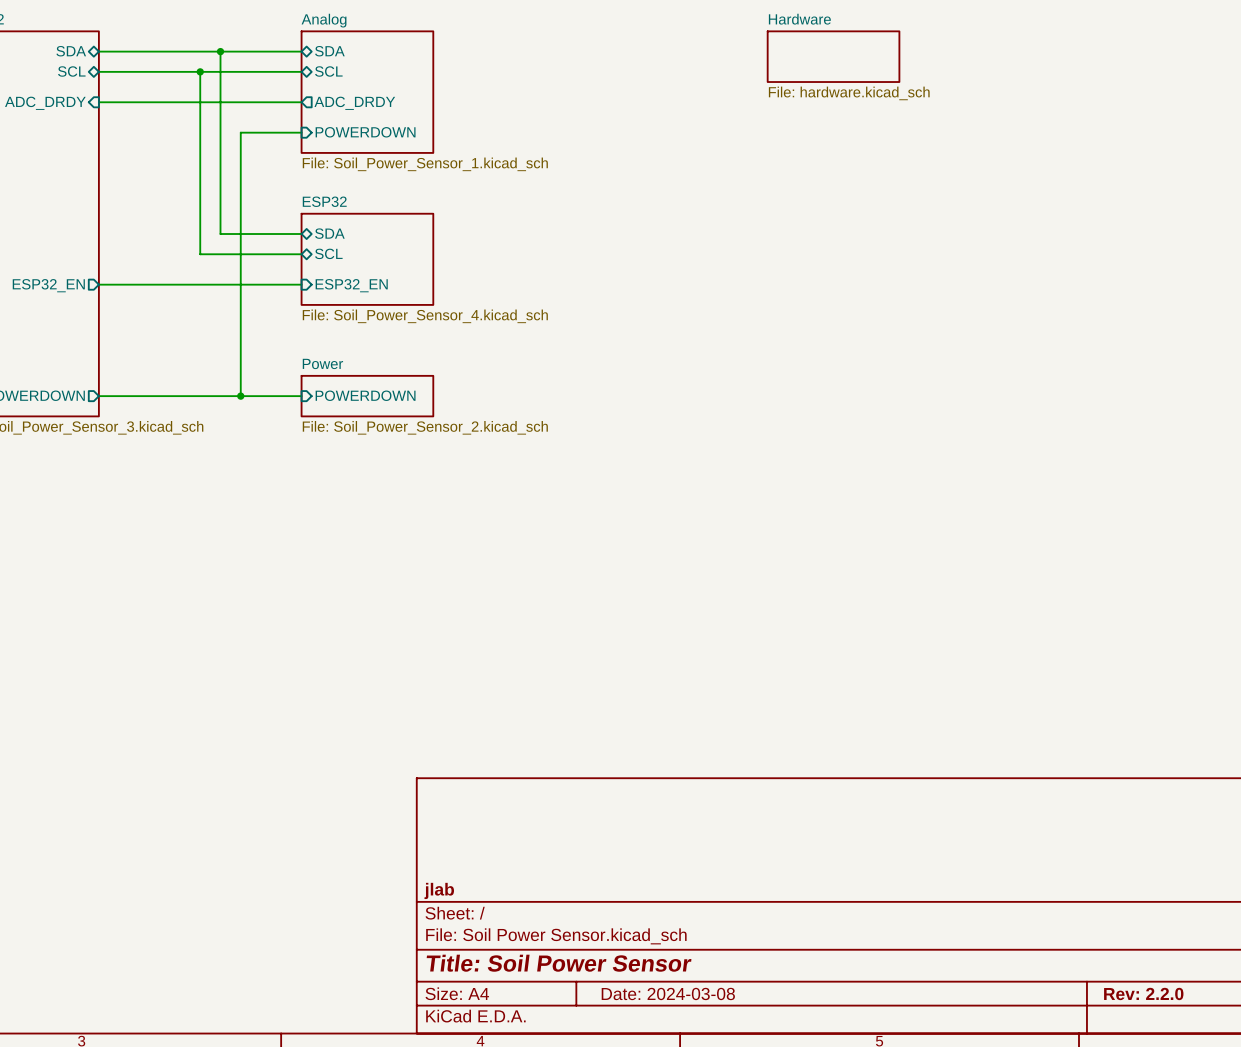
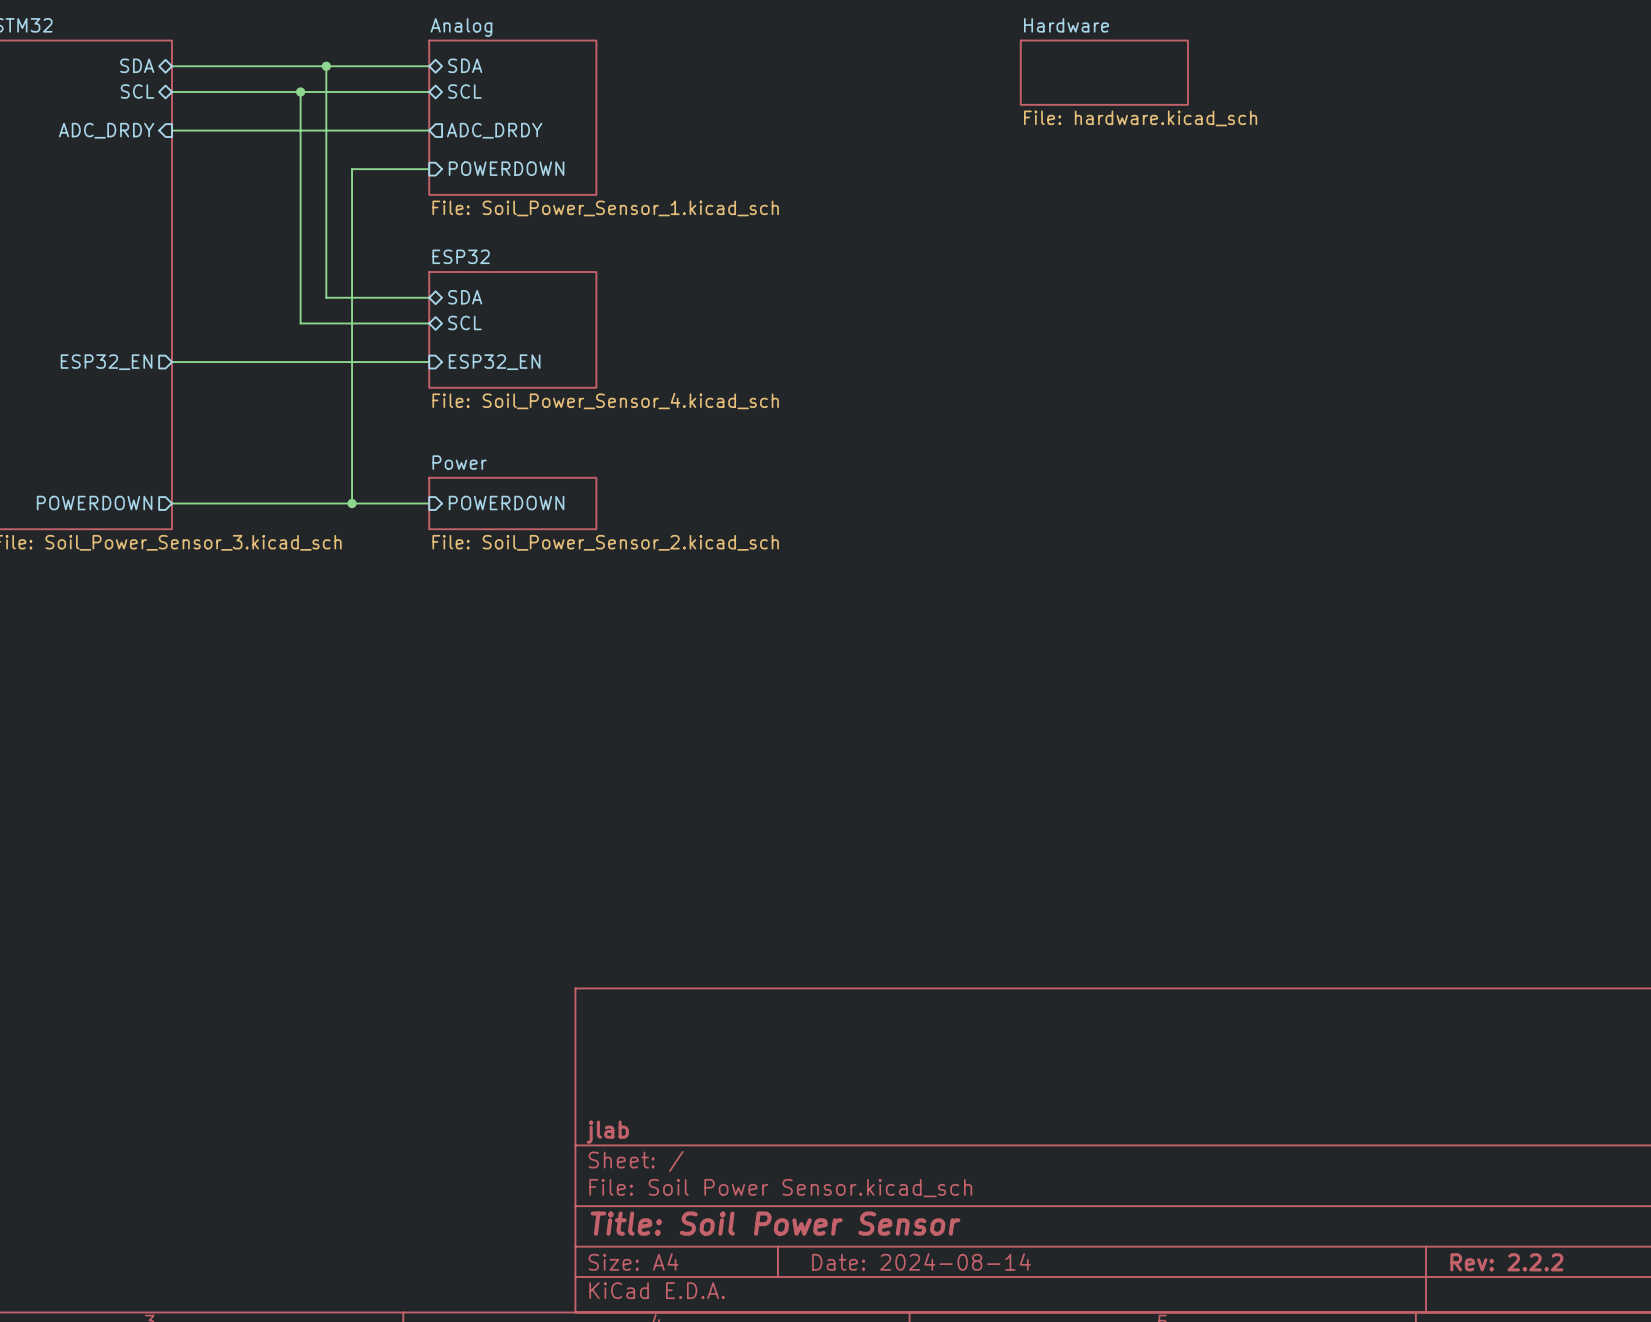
title block: Date: 2024-03-08 (668, 993) -> Date: 2024-08-14 (921, 1261)
title block: Rev: 2.2.0 (1143, 993) -> Rev: 2.2.2 (1506, 1262)

